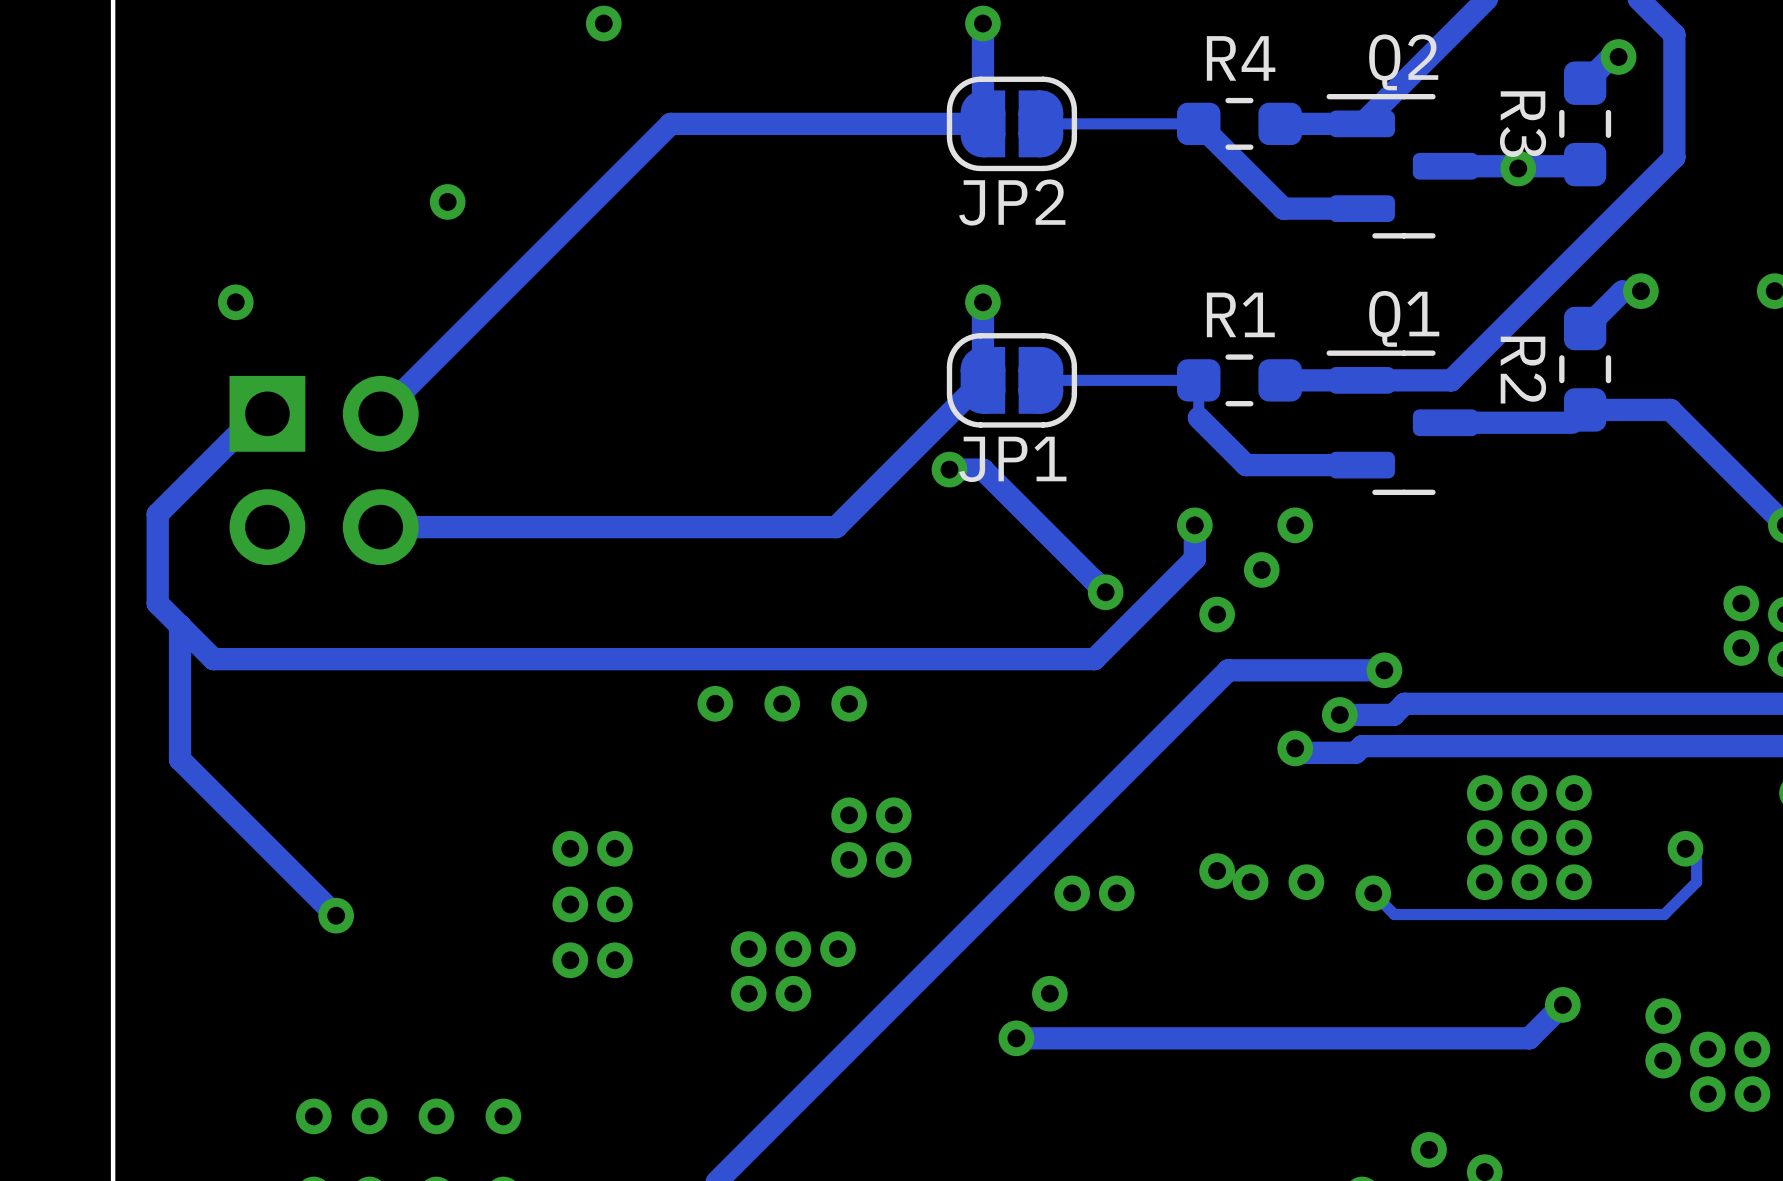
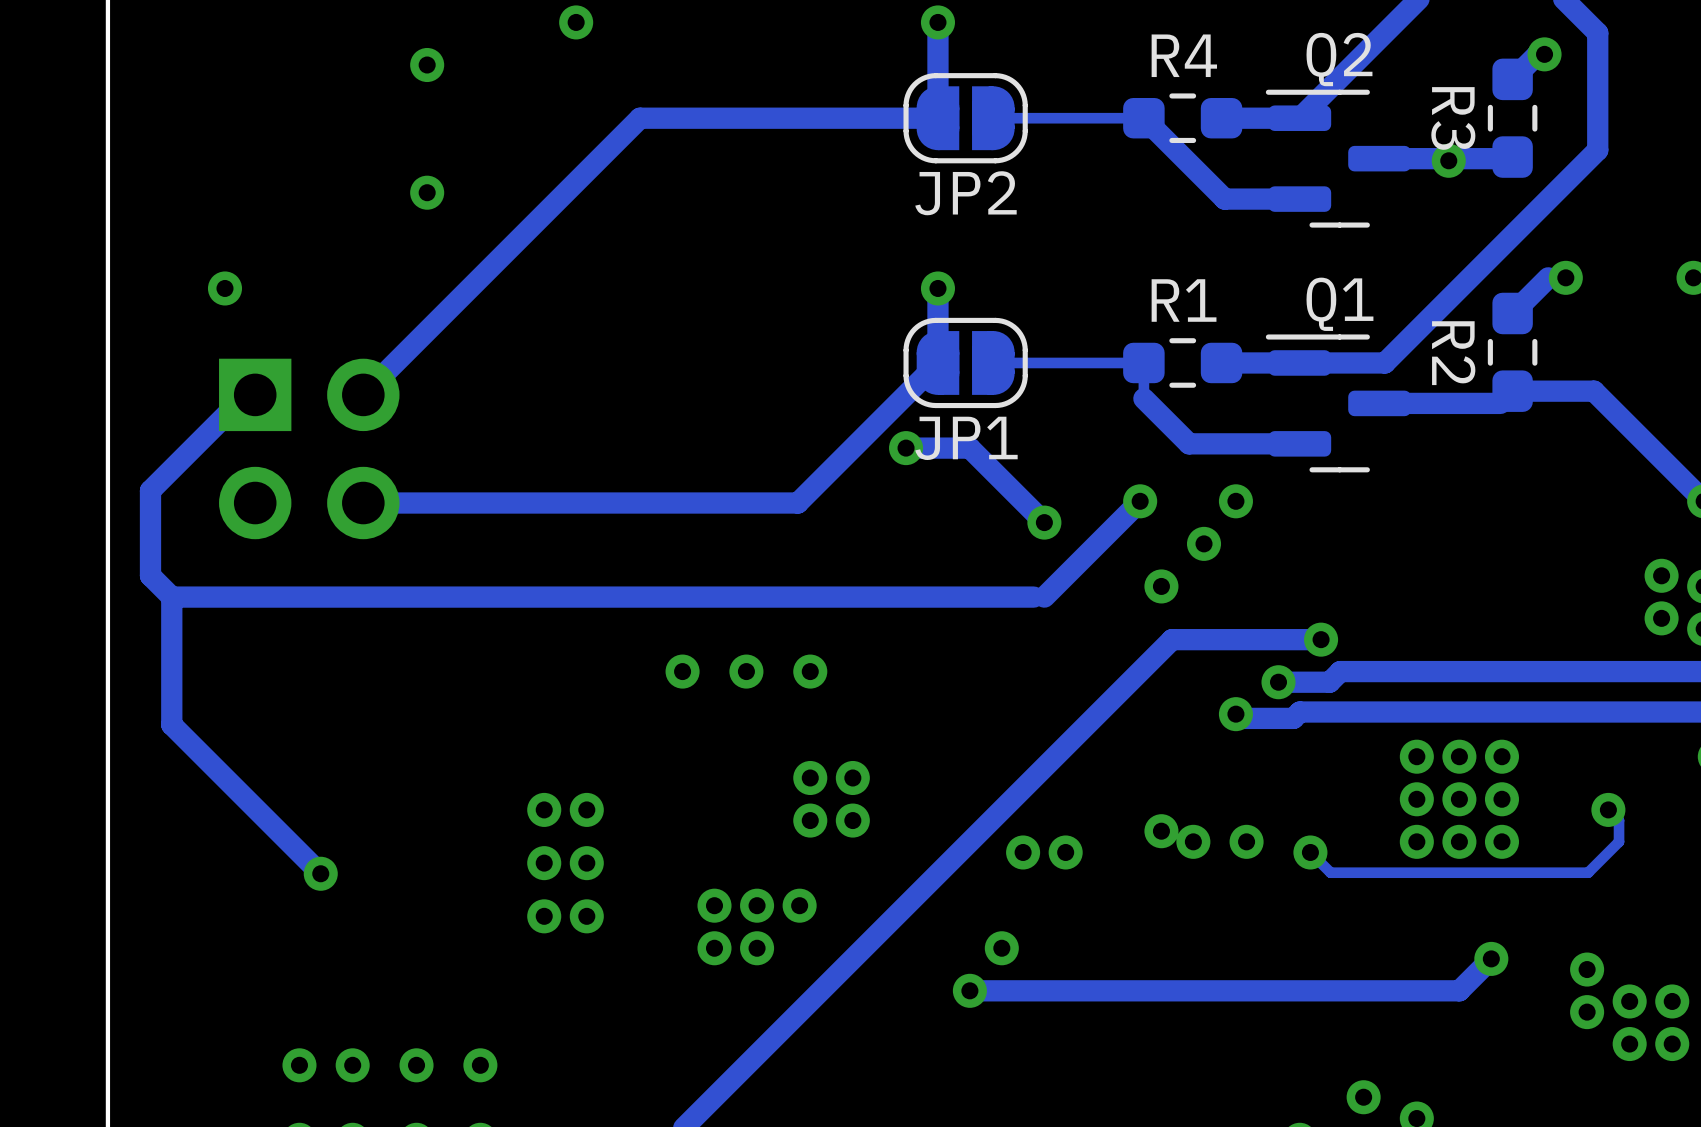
via: none -> (427, 65)
track: (982, 469) (1105, 592) -> (937, 448) (969, 448) (1044, 522)
track: (1194, 525) (1194, 558) (1094, 659) (213, 659) (180, 625) -> (1140, 501) (1044, 597) (171, 597)
via position: (1105, 592) -> (1044, 522)

